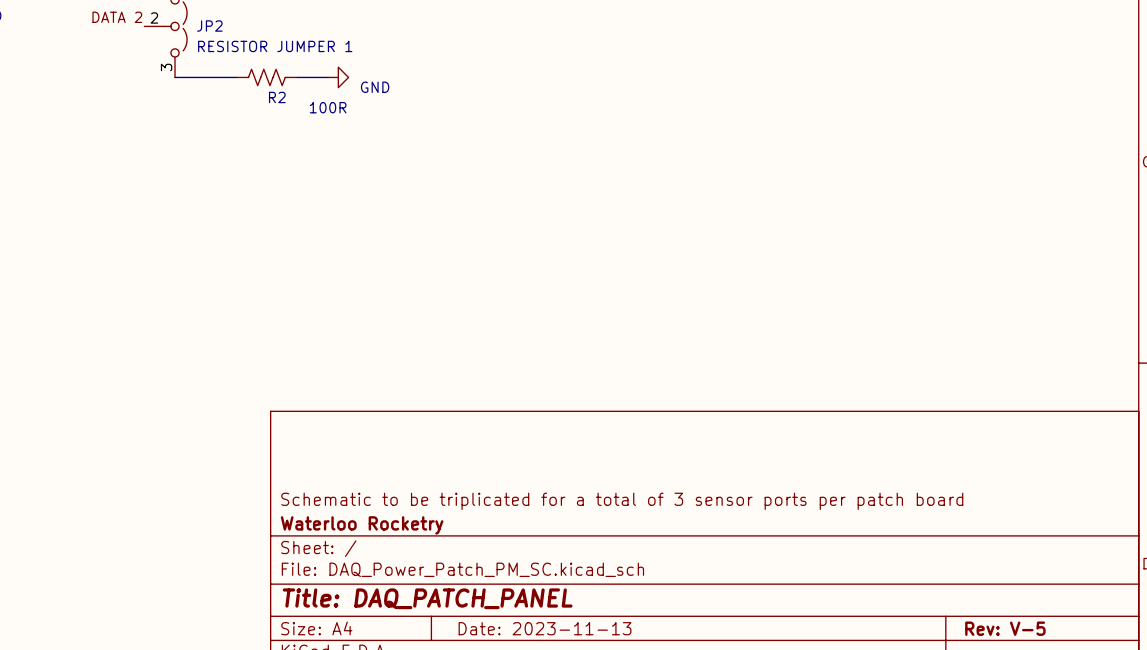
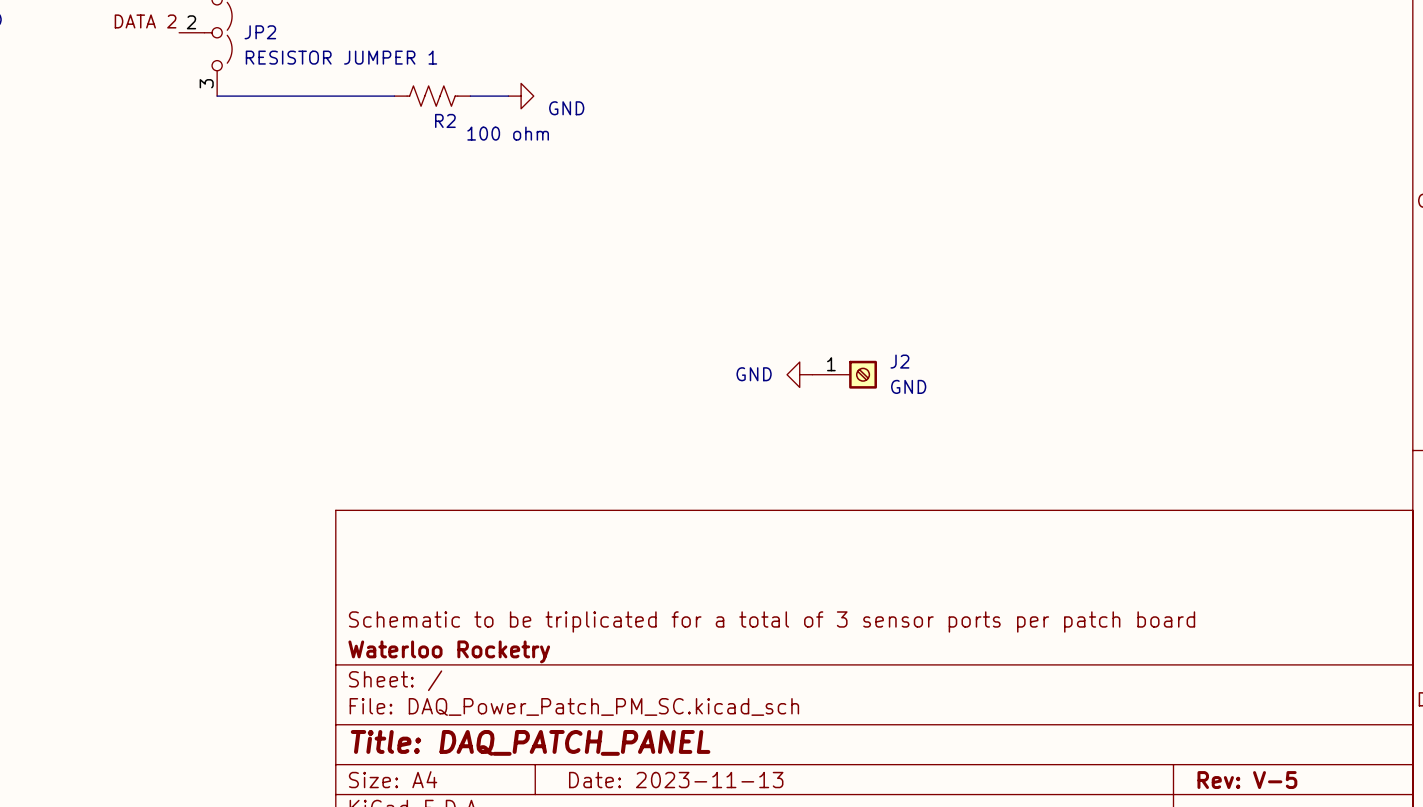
R2 position: (266, 77) -> (432, 96)
power symbol position: GND (338, 77) -> GND (521, 96)
wire: none -> (470, 96) (508, 96)
R2 value: 100R (328, 107) -> 100 ohm (508, 133)
power symbol: none -> GND (799, 374)
J2: none -> GND (844, 374)

